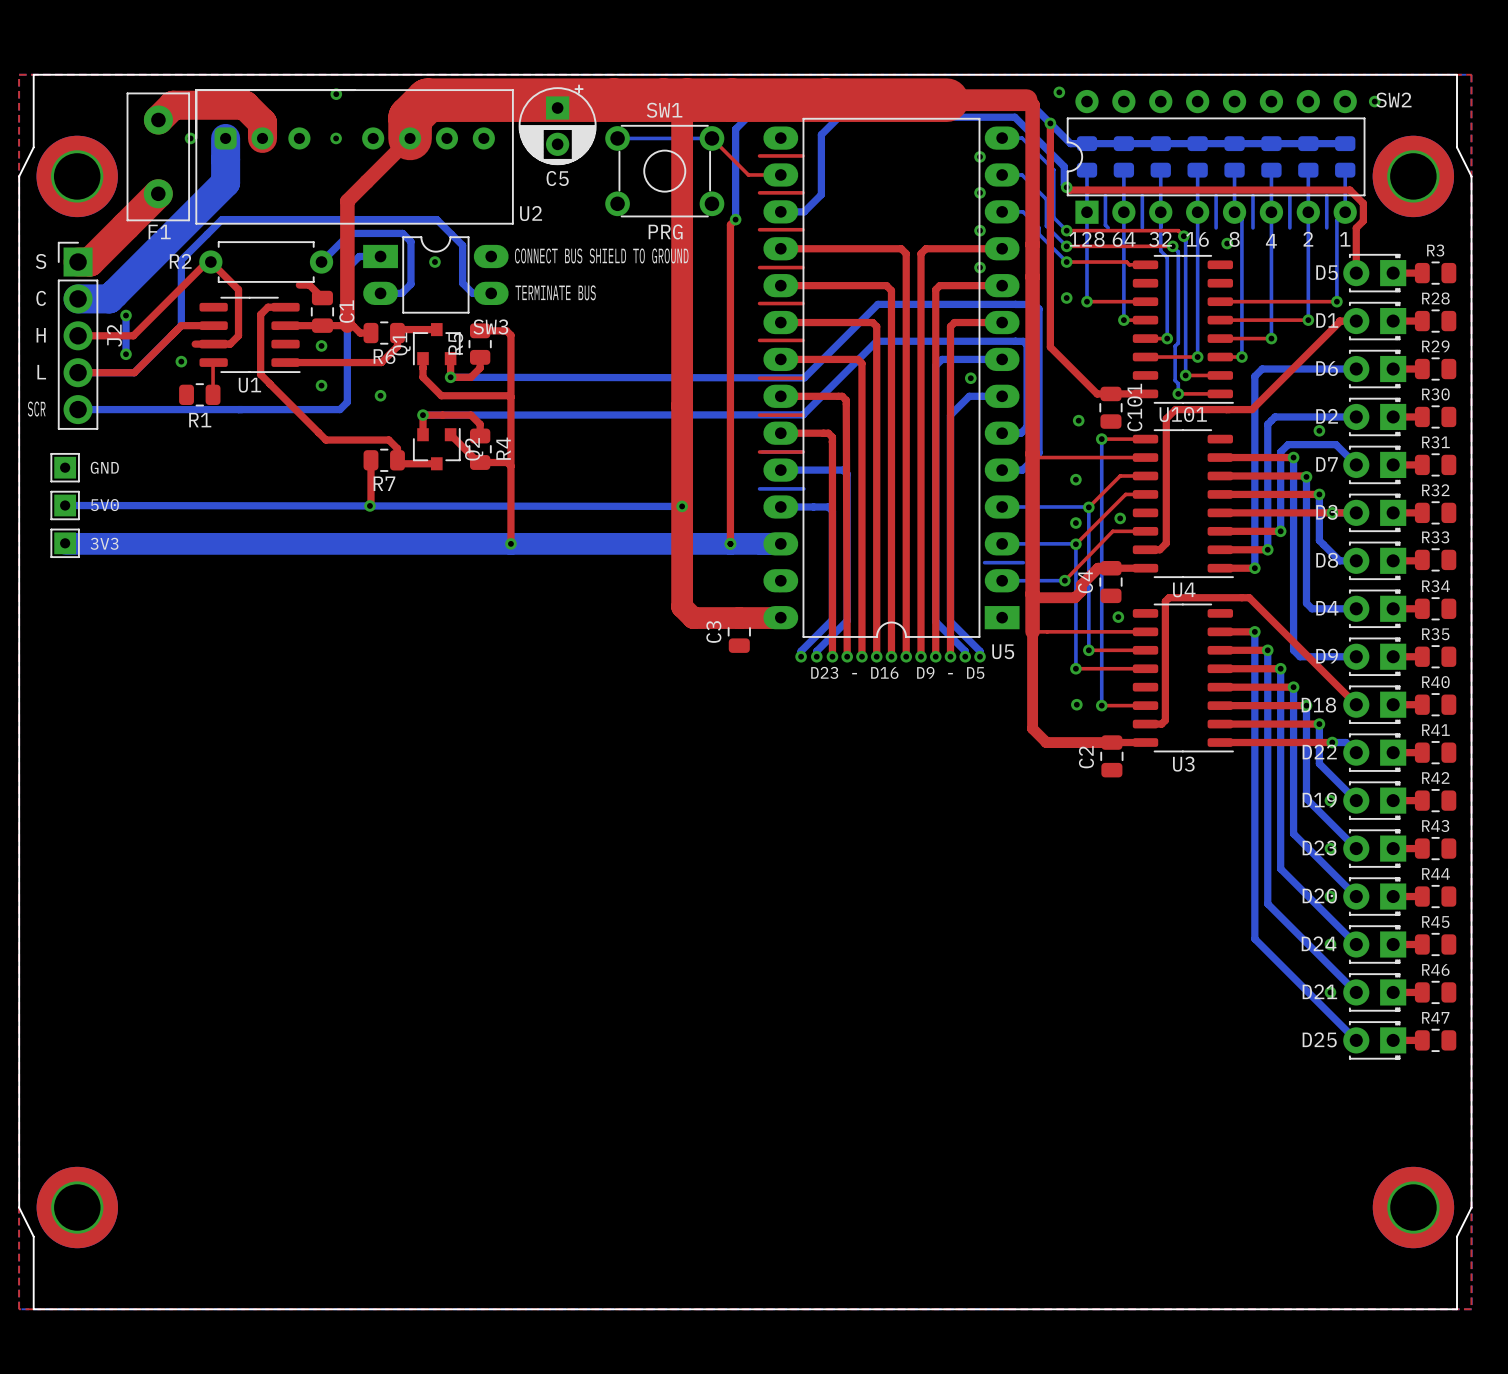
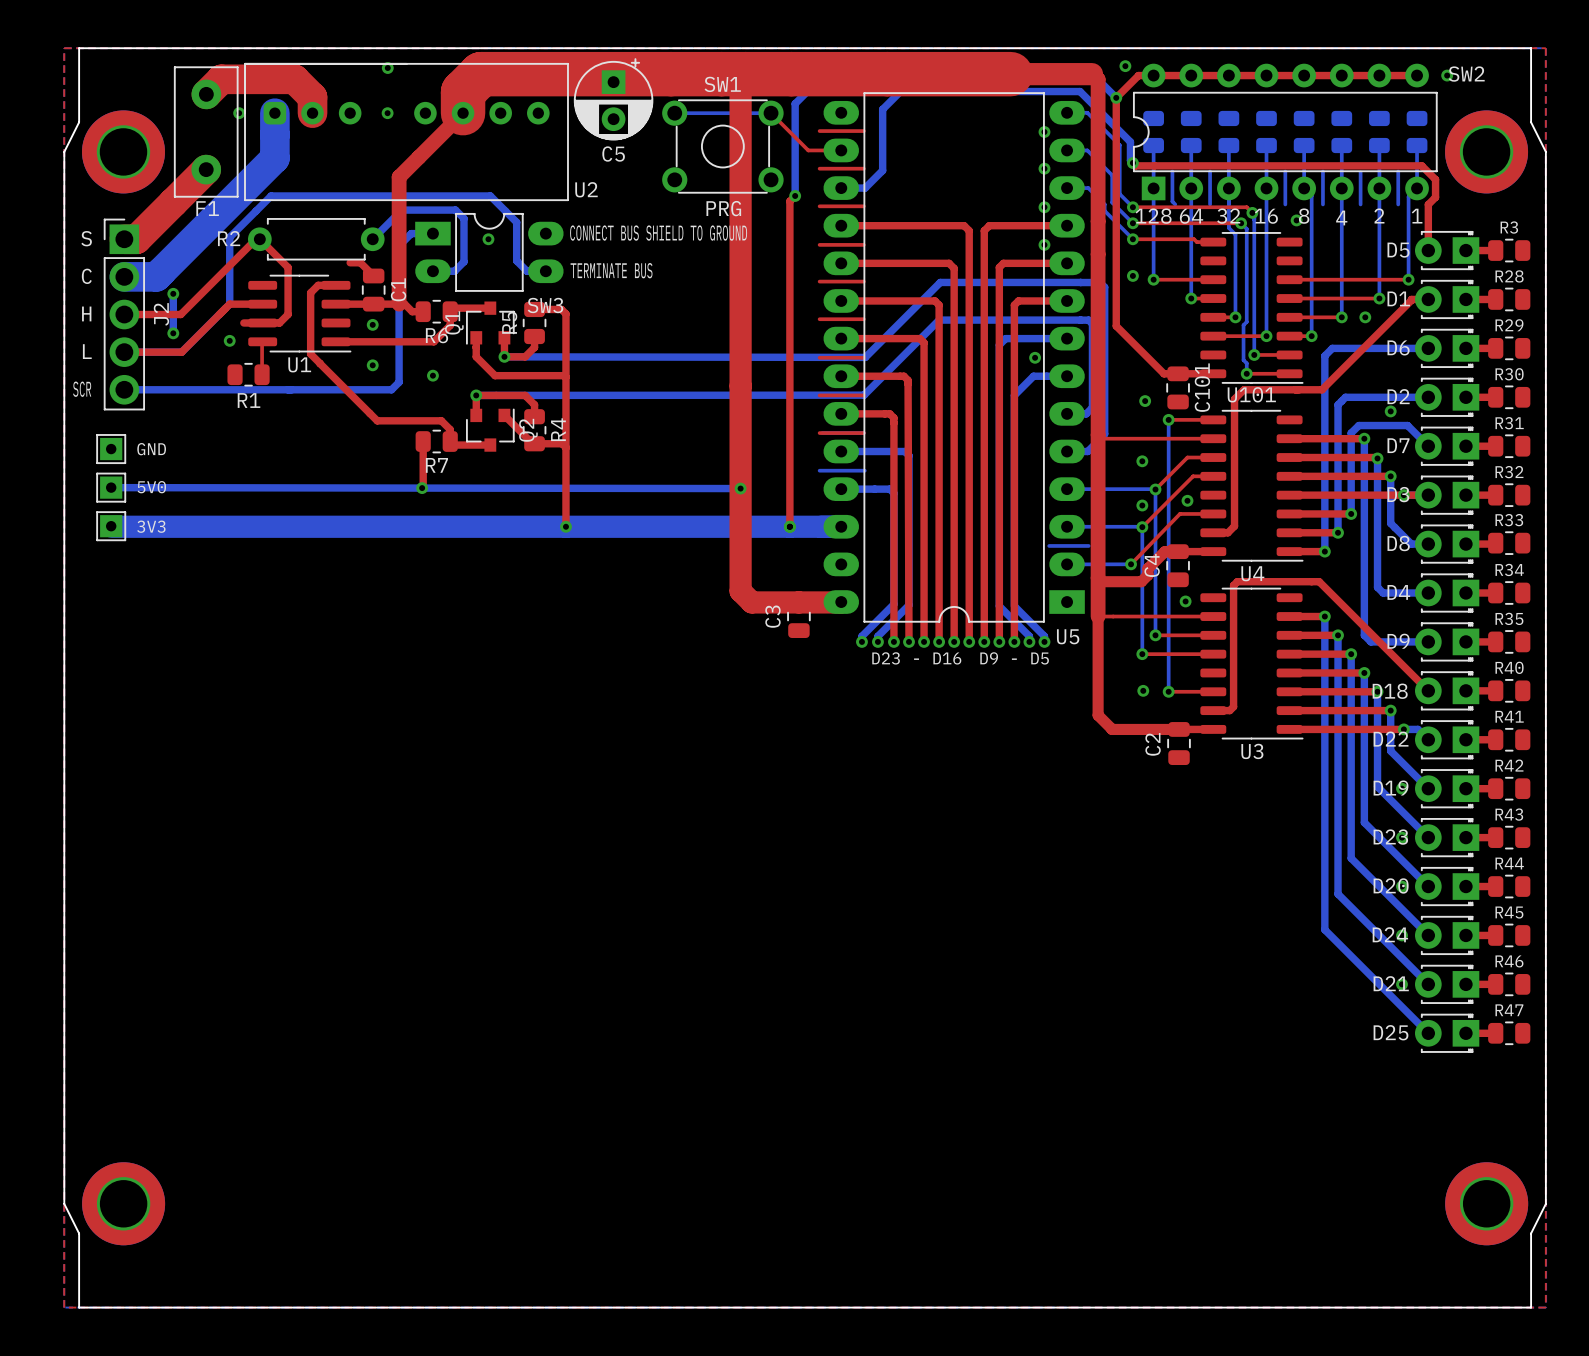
top track: none -> (1417, 75) (1138, 75) (1116, 97)
bottom track: (1050, 123) (1070, 143) (1345, 143) -> none
via: none -> (1365, 317)

